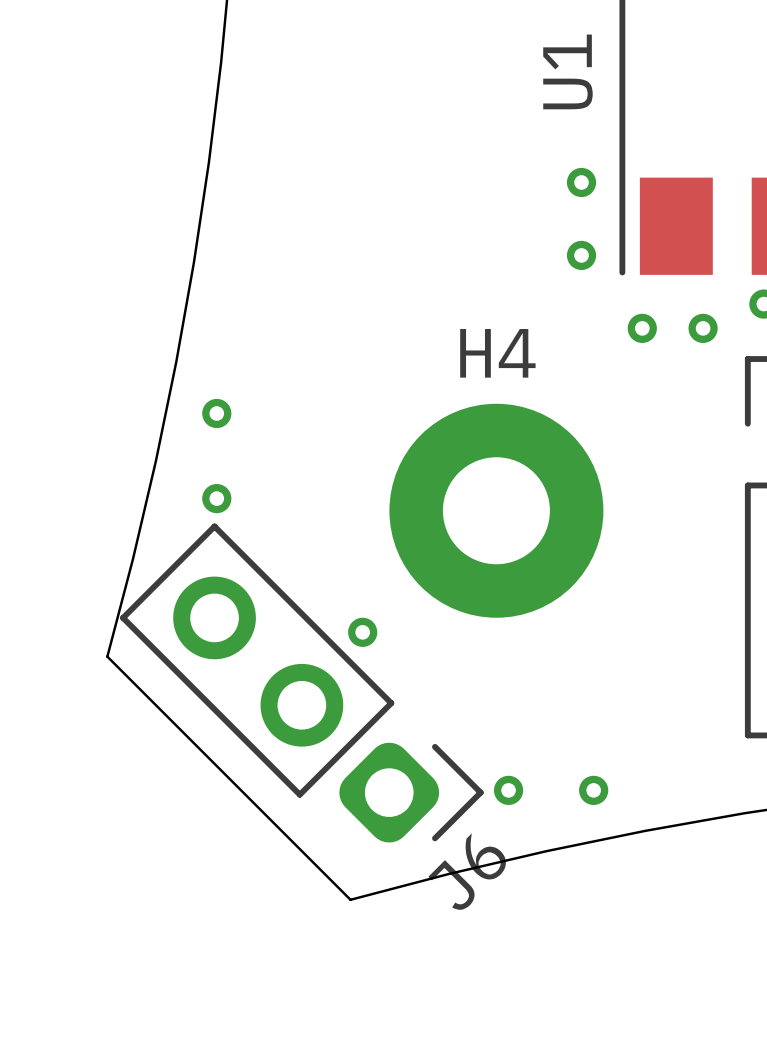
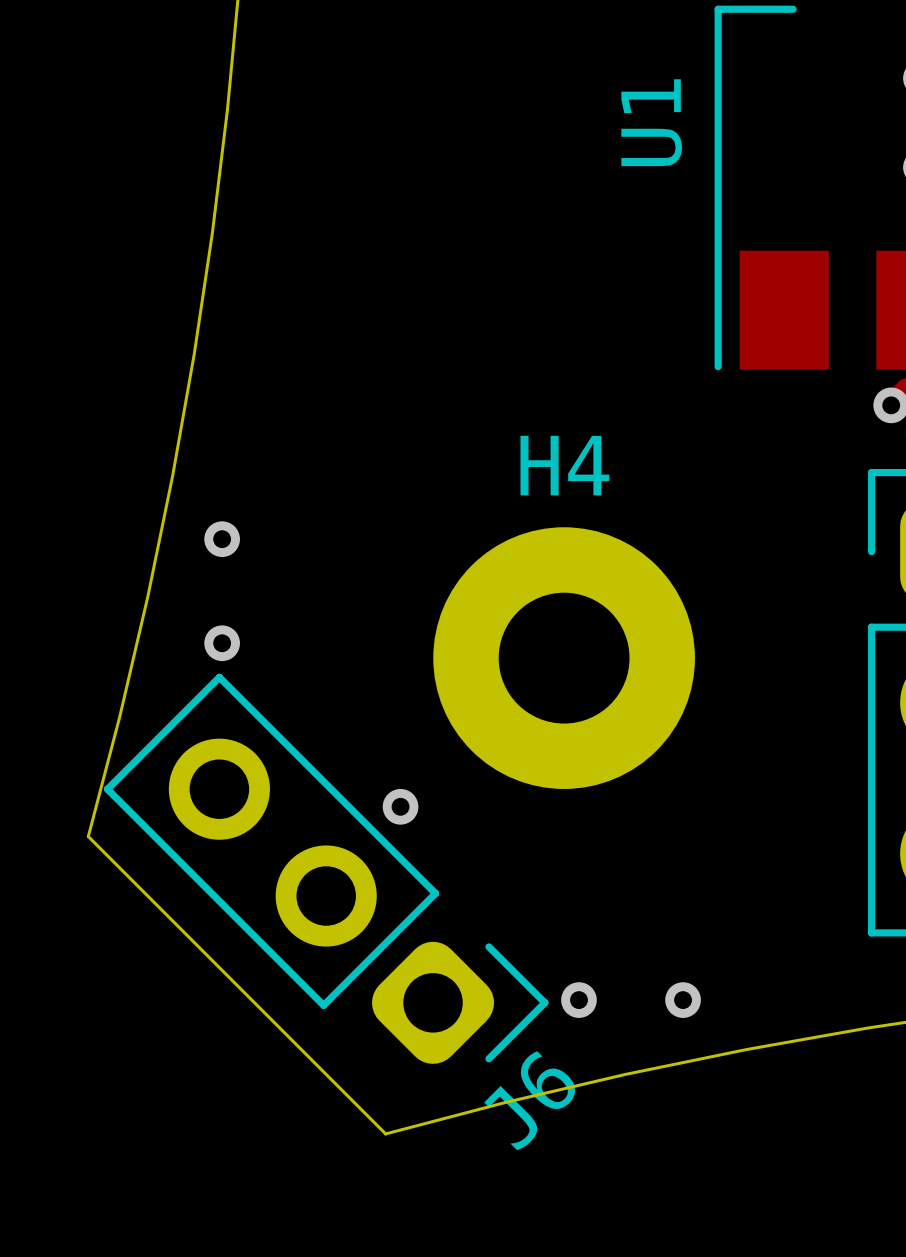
via: (581, 182) -> none
via: (581, 255) -> none
via: (642, 328) -> none
via: (703, 328) -> none

